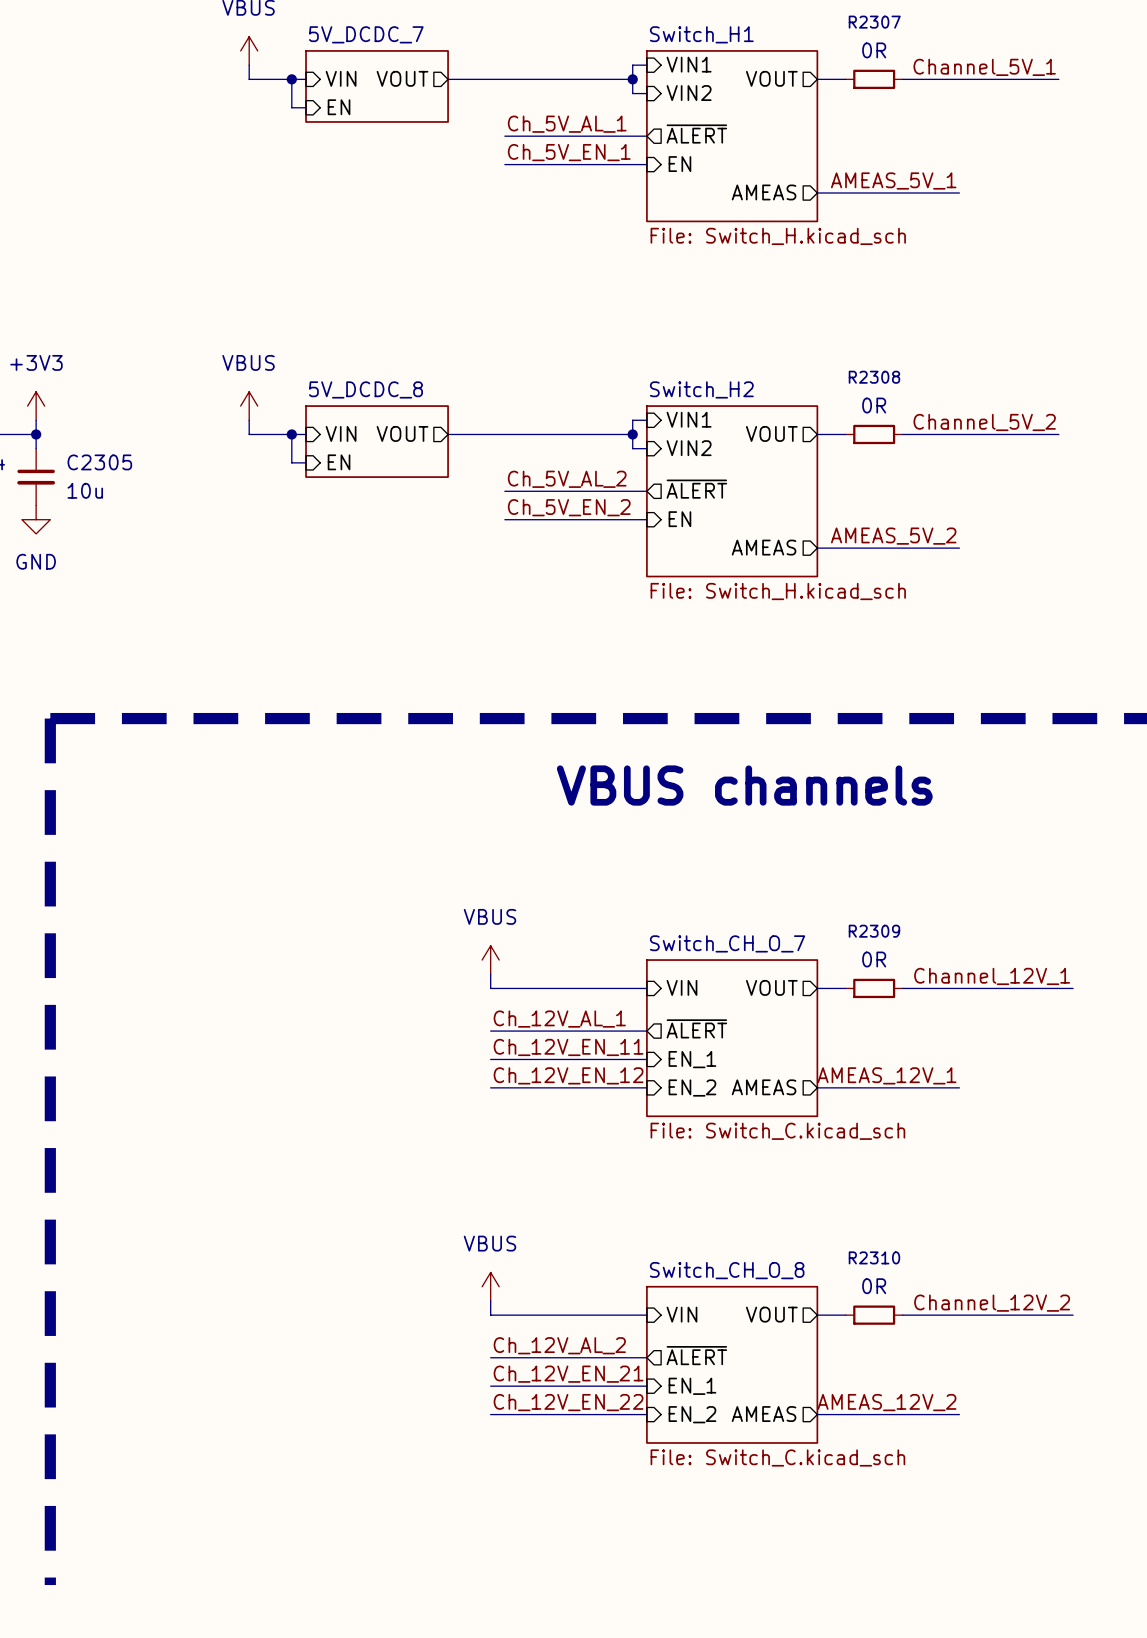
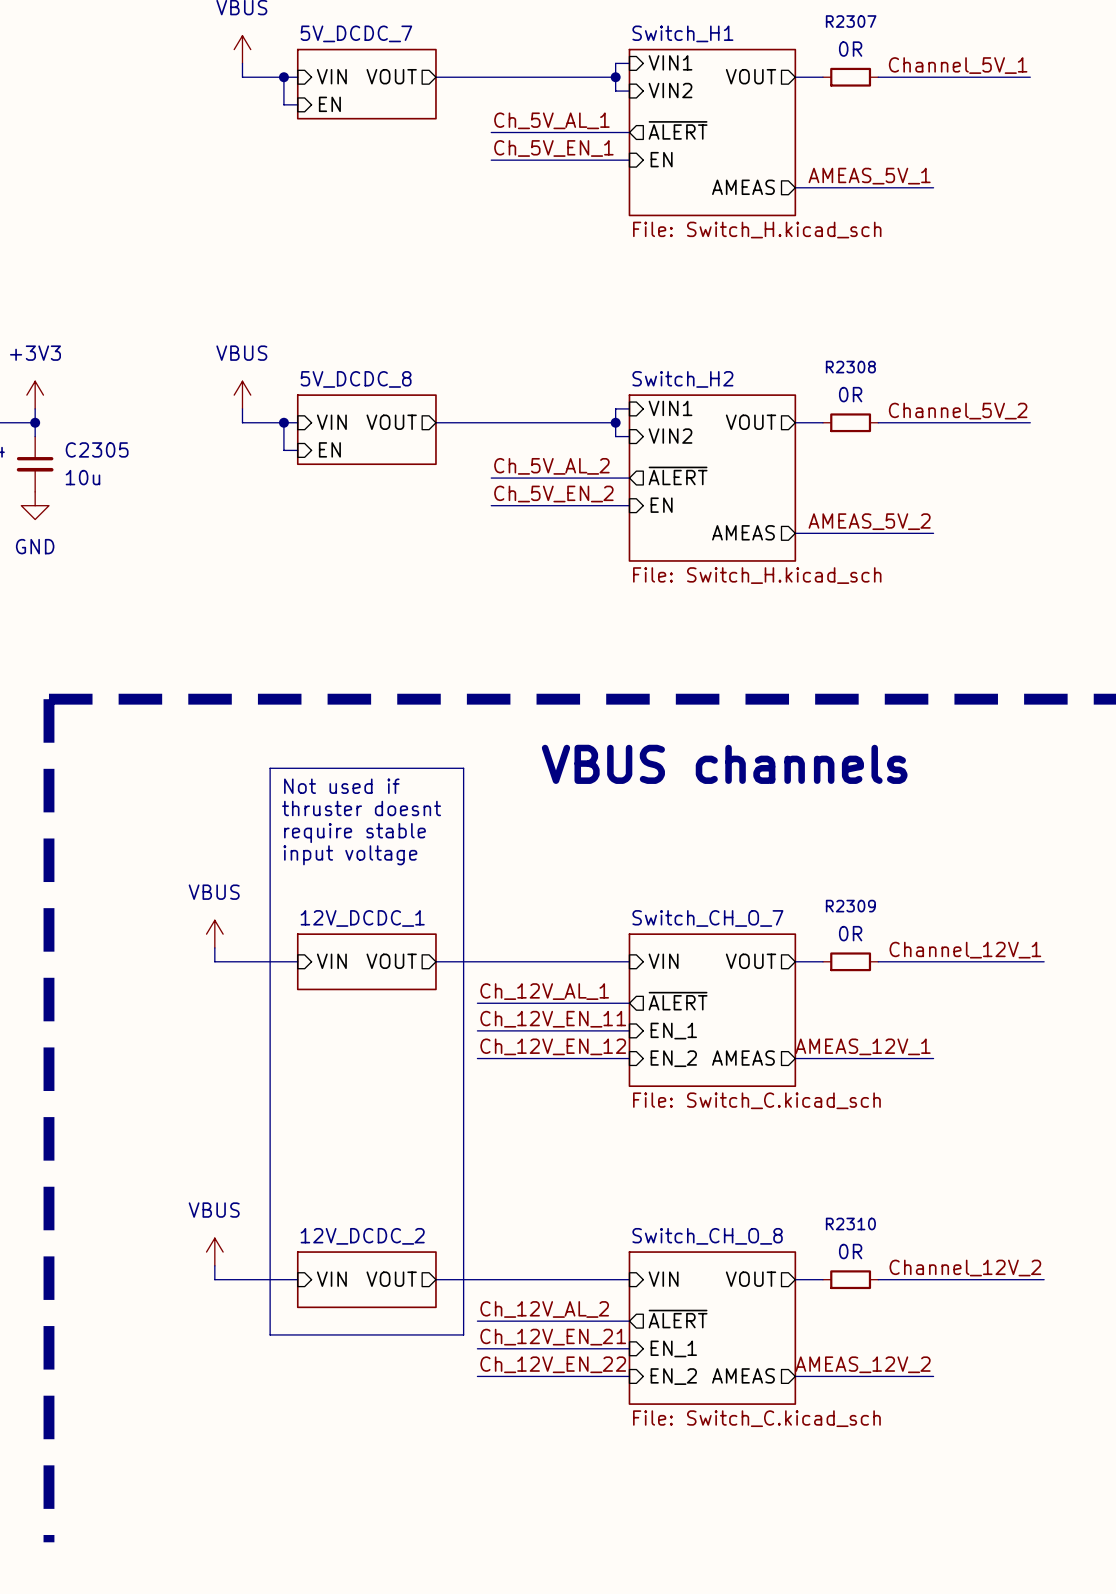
line: none -> (270, 768) (463, 768) (463, 1334) (270, 1334) (270, 768)
text: none -> Not used if (341, 786)
text: none -> thruster doesnt (361, 808)
text: none -> require stable (354, 833)
text: none -> input voltage (350, 855)
power symbol: none -> VBUS (214, 934)
power symbol: VBUS (490, 960) -> none
wire: none -> (214, 947) (214, 961) (297, 961)
wire: (490, 974) (490, 988) -> (435, 961) (477, 961)
sheet pin: none -> VIN (331, 961)
sheet pin: none -> VOUT (391, 961)
sheet 12V_DCDC_1: none -> (366, 961)
power symbol: none -> VBUS (214, 1252)
power symbol: VBUS (490, 1286) -> none
wire: none -> (214, 1265) (214, 1279) (297, 1279)
wire: (490, 1300) (490, 1315) -> (435, 1279) (477, 1279)
sheet pin: none -> VIN (331, 1279)
sheet pin: none -> VOUT (391, 1279)
sheet 12V_DCDC_2: none -> (366, 1279)

